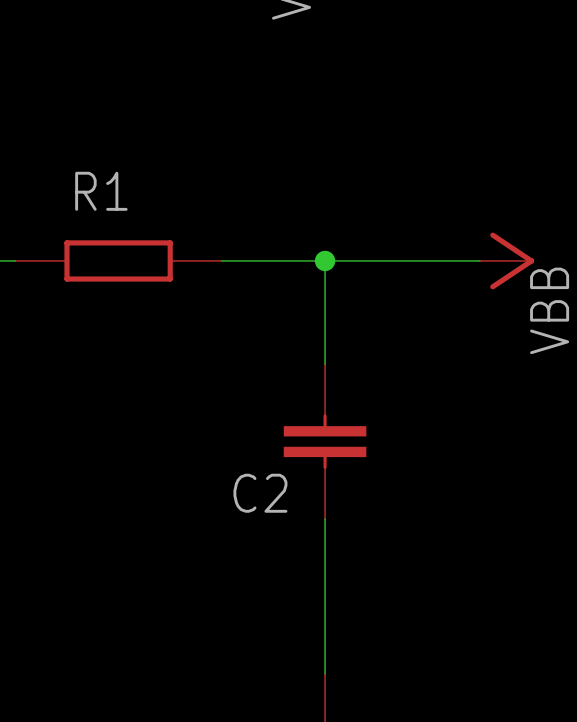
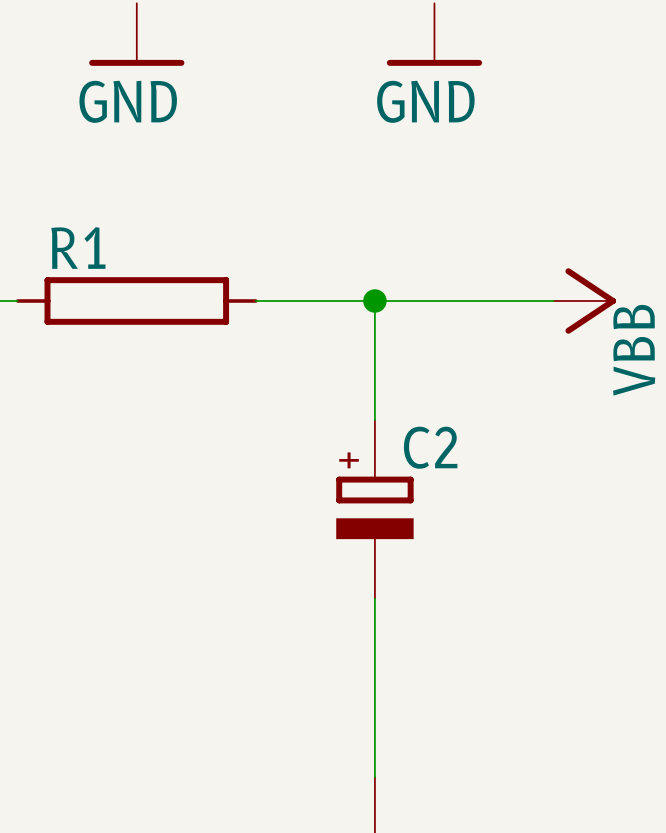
power symbol: none -> GND (136, 34)
power symbol: none -> GND (434, 34)
R1 symbol: [15, 240, 222, 282] -> [15, 277, 258, 325]
C2 symbol: [283, 364, 367, 520] -> [336, 420, 414, 599]
C2 name position: C2 (260, 493) -> C2 (430, 447)

